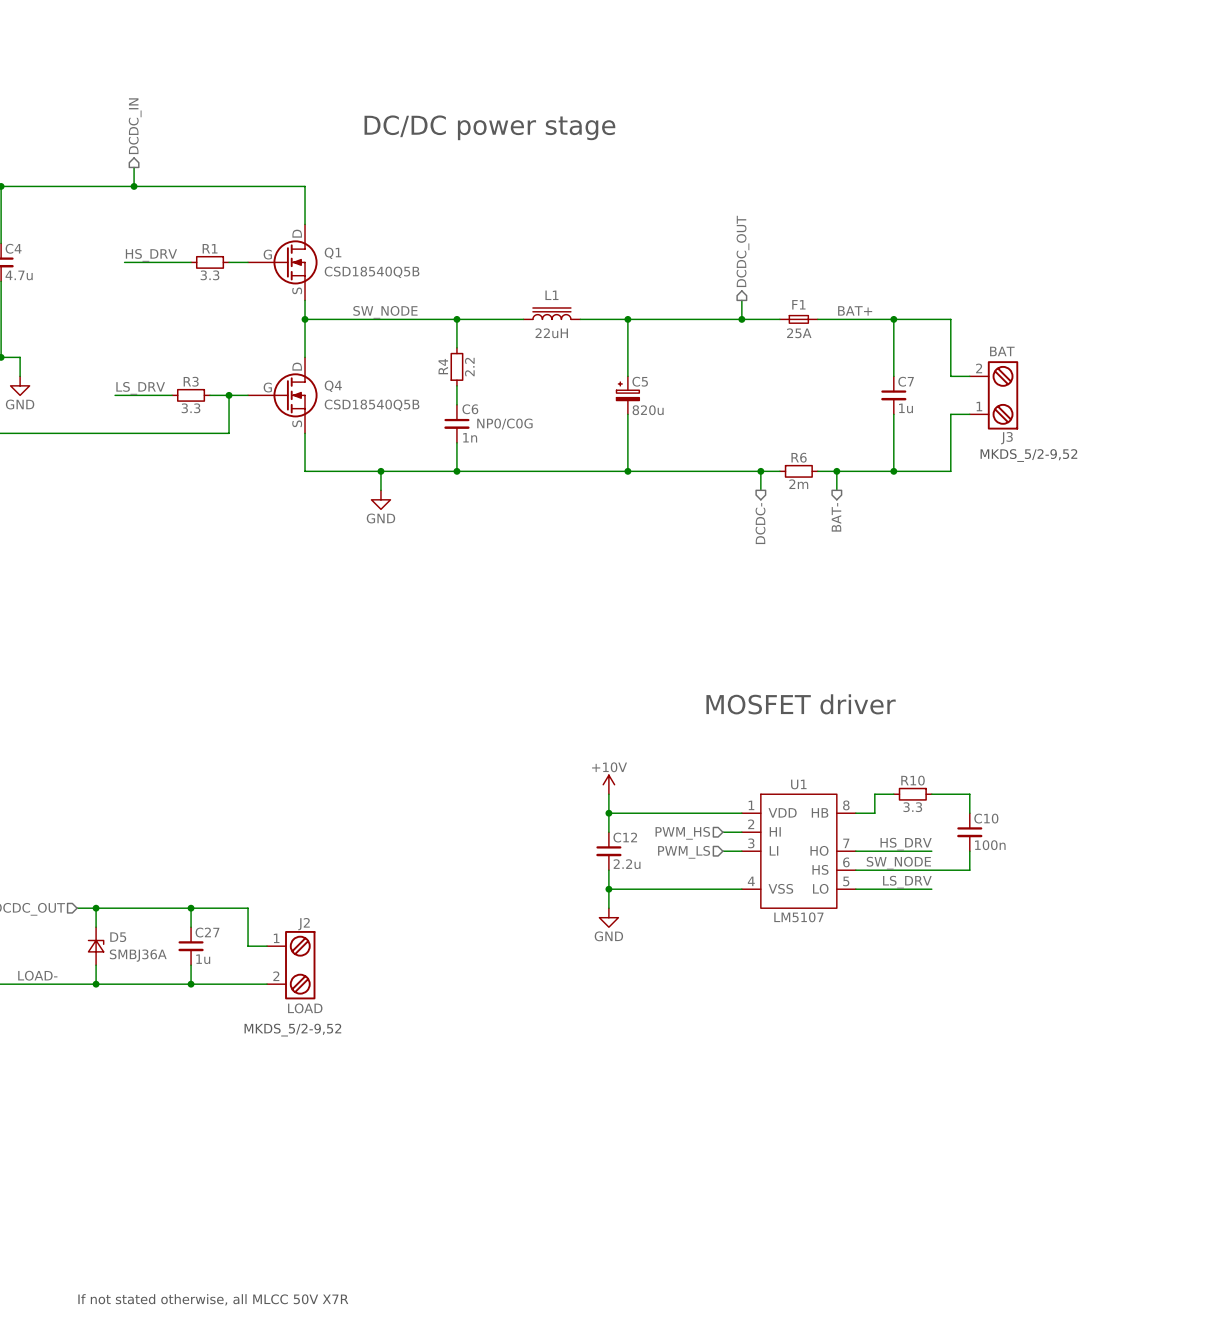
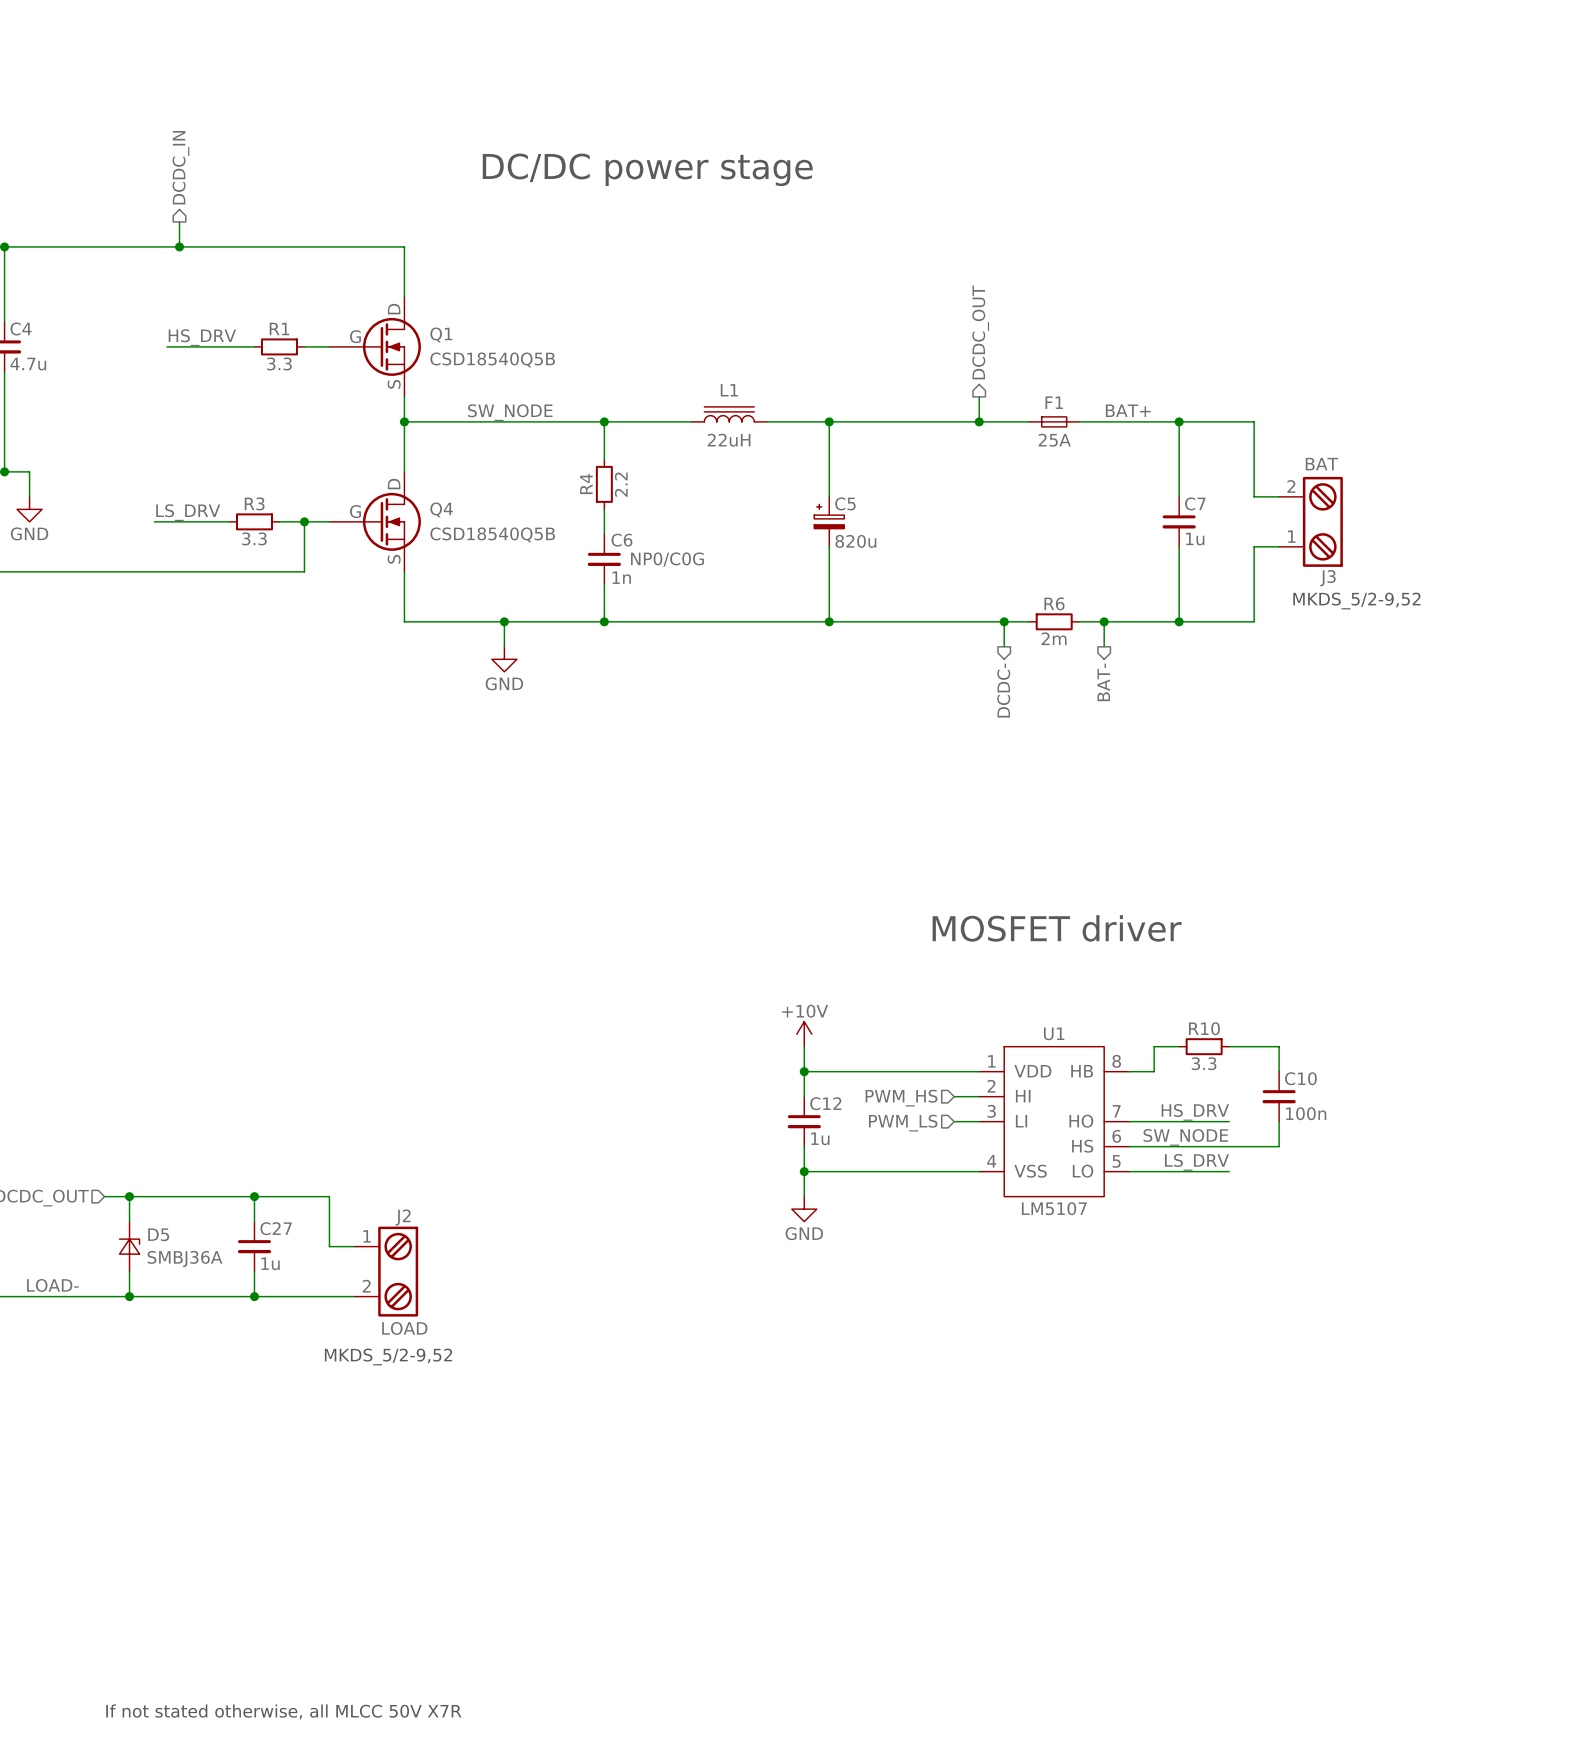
C12 value: 2.2u (627, 864) -> 1u (820, 1138)

